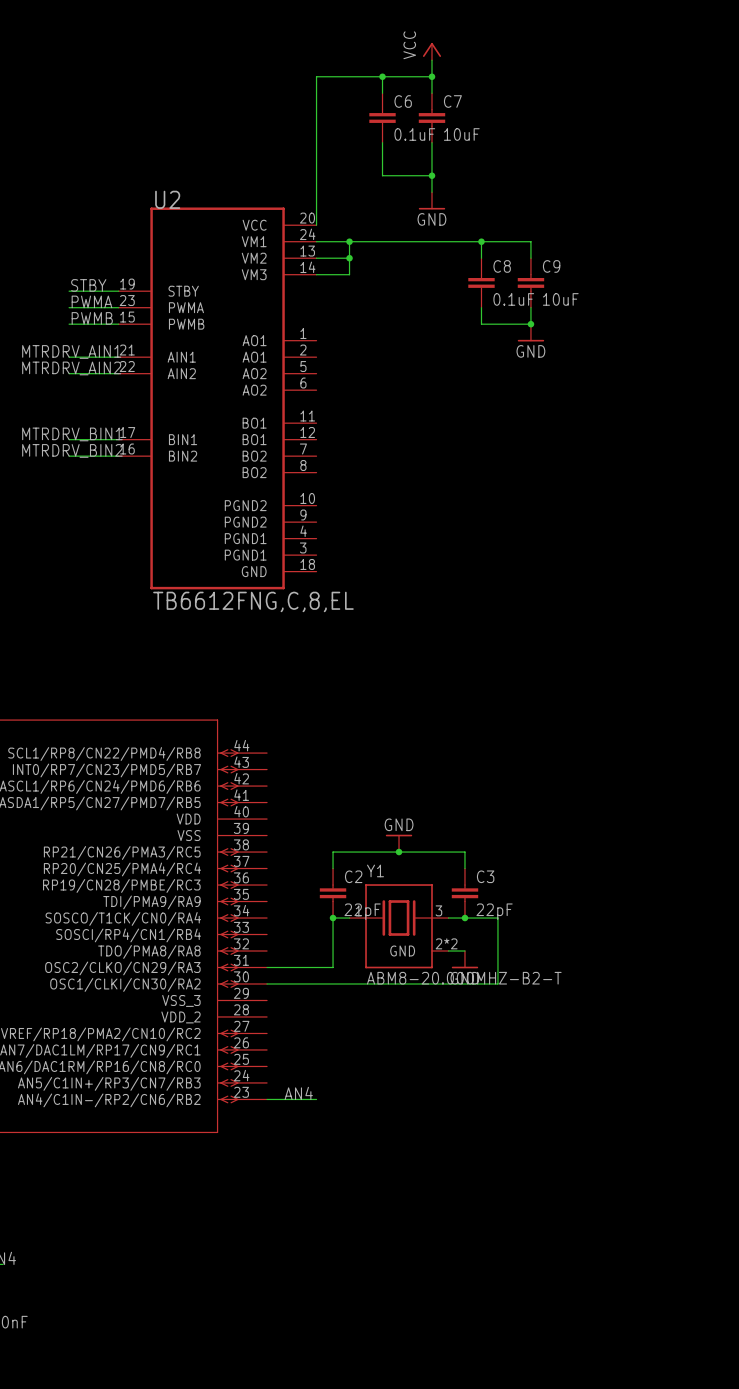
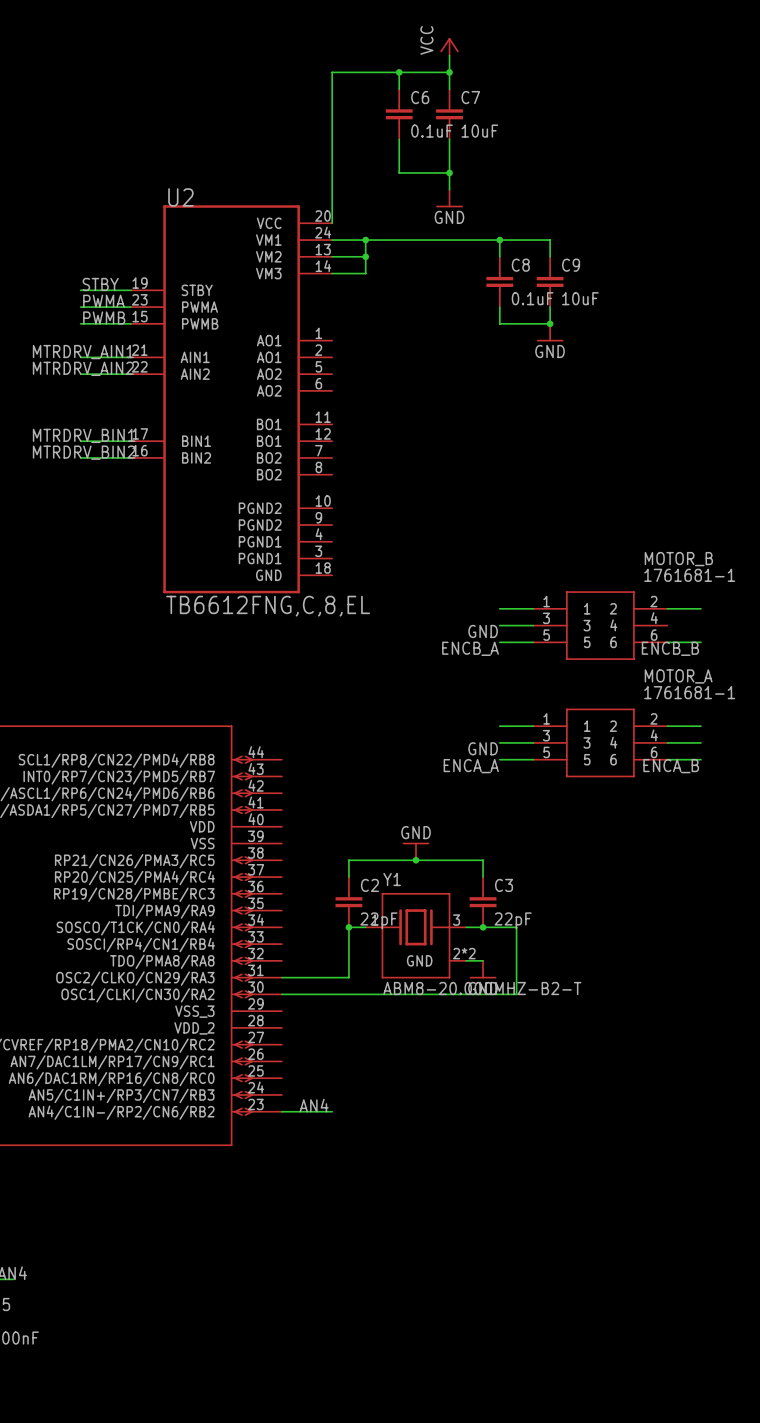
wire: none -> (499, 608) (533, 608)
wire: none -> (667, 608) (700, 608)
wire: none -> (499, 625) (533, 625)
MOTOR_B: none -> 1761681-1 (600, 625)
label: none -> GND (483, 631)
wire: none -> (499, 642) (533, 642)
wire: none -> (667, 642) (700, 642)
label: none -> ENCB_A (470, 648)
label: none -> ENCB_B (670, 648)
wire: none -> (499, 726) (533, 726)
wire: none -> (667, 726) (700, 726)
wire: none -> (499, 742) (533, 742)
MOTOR_A: none -> 1761681-1 (600, 742)
wire: none -> (667, 742) (700, 742)
label: none -> GND (483, 748)
wire: none -> (499, 759) (533, 759)
wire: none -> (667, 759) (700, 759)
label: none -> ENCA_A (471, 766)
label: none -> ENCA_B (671, 766)

